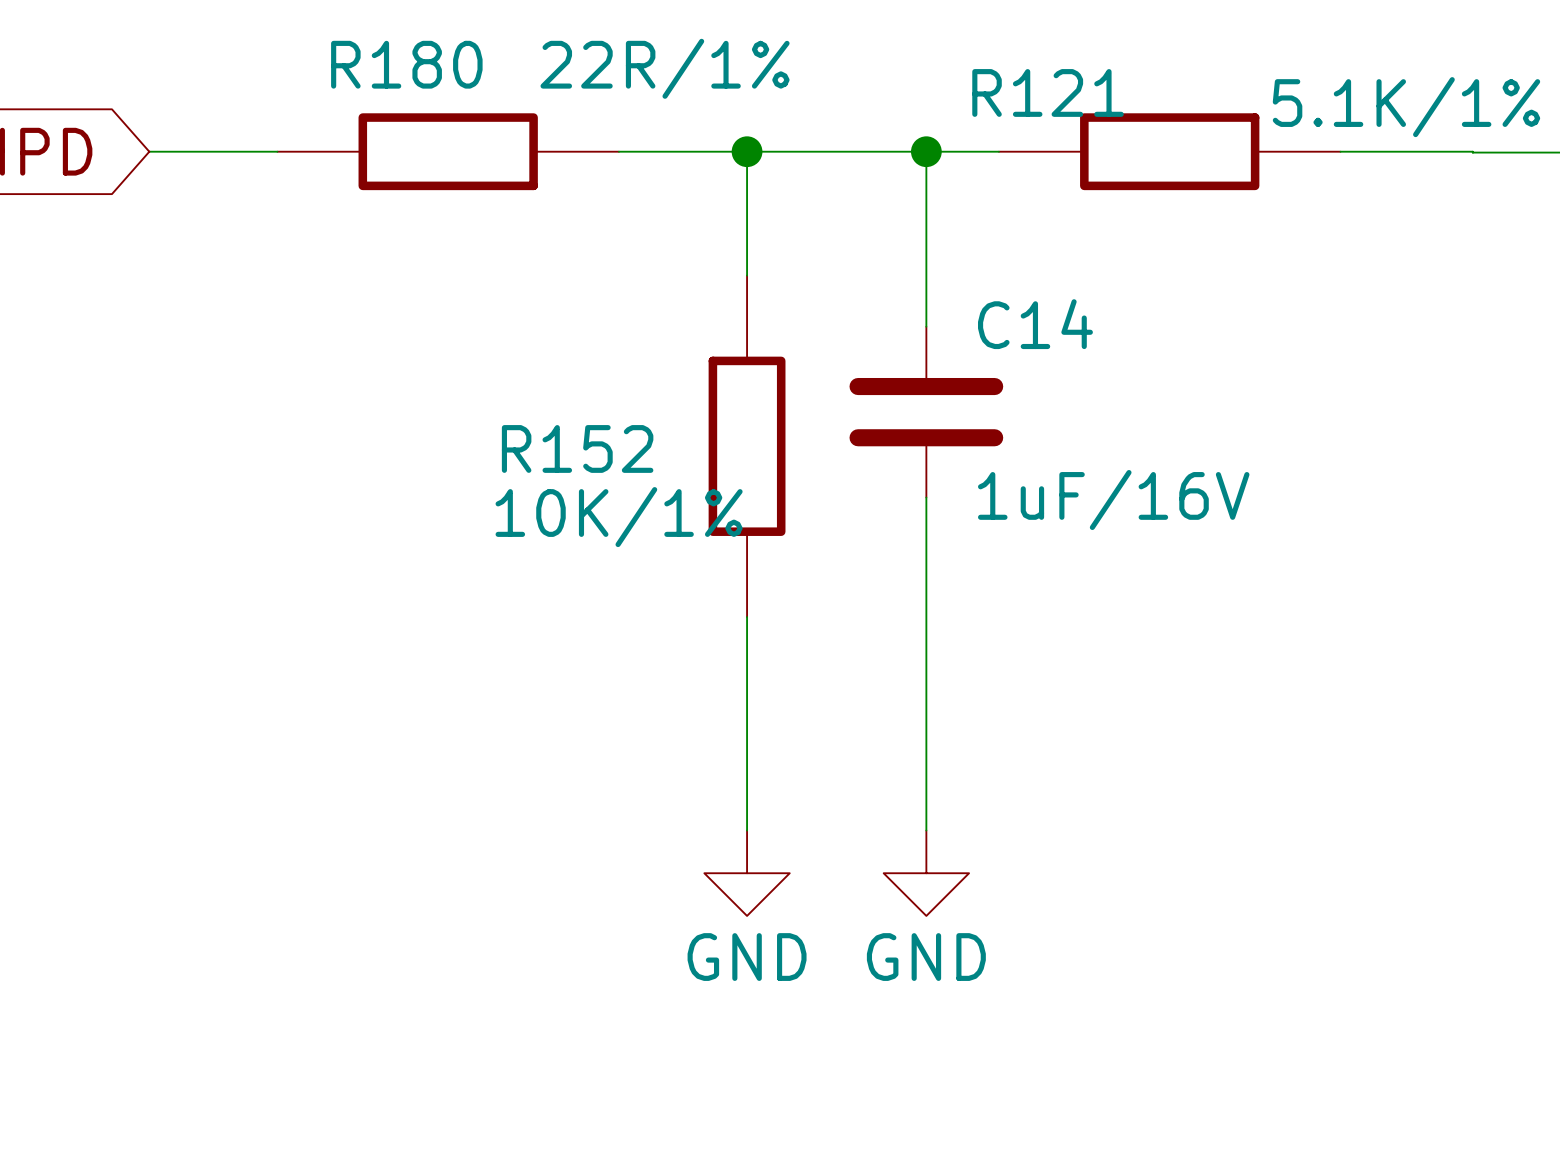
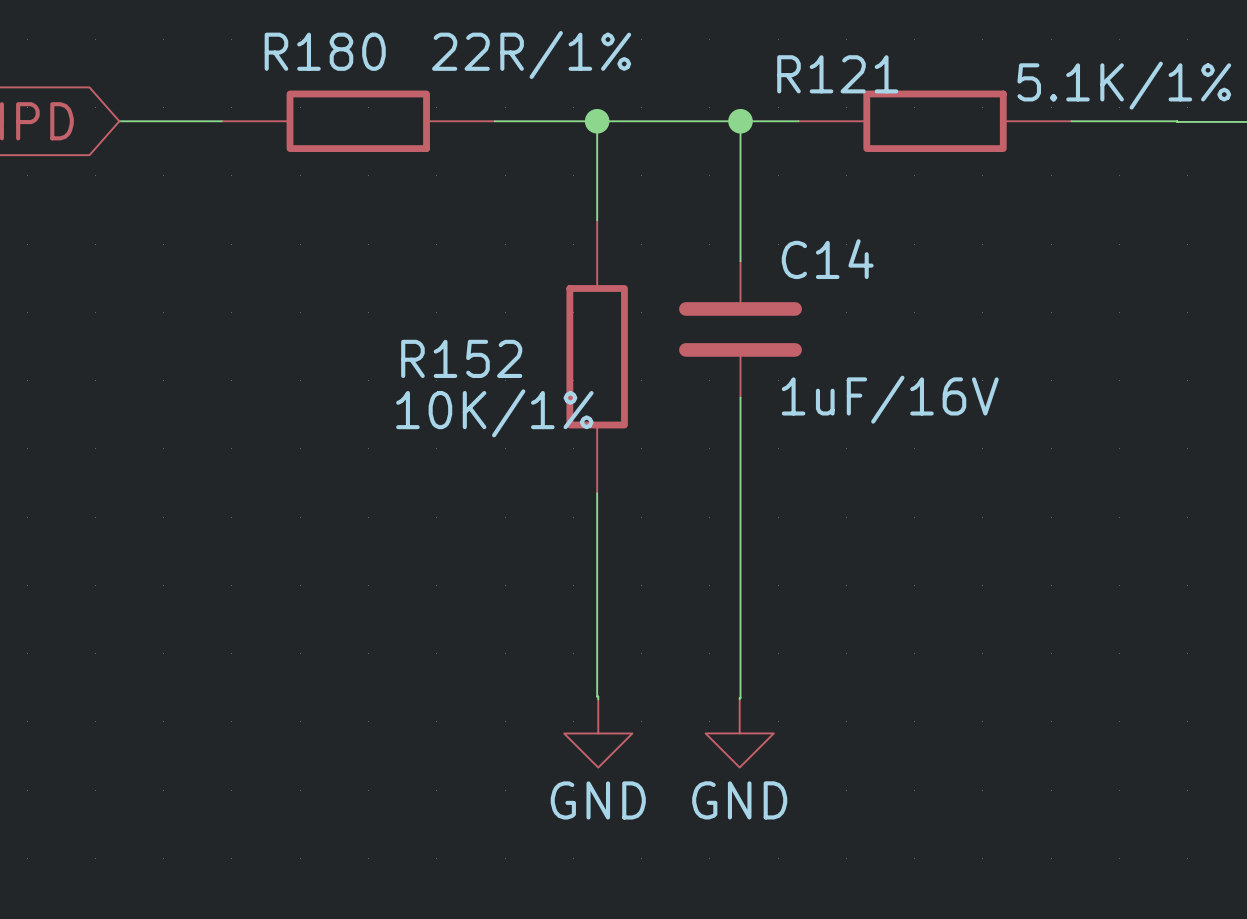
power symbol position: GND (747, 873) -> GND (598, 733)
power symbol position: GND (926, 873) -> GND (739, 733)

